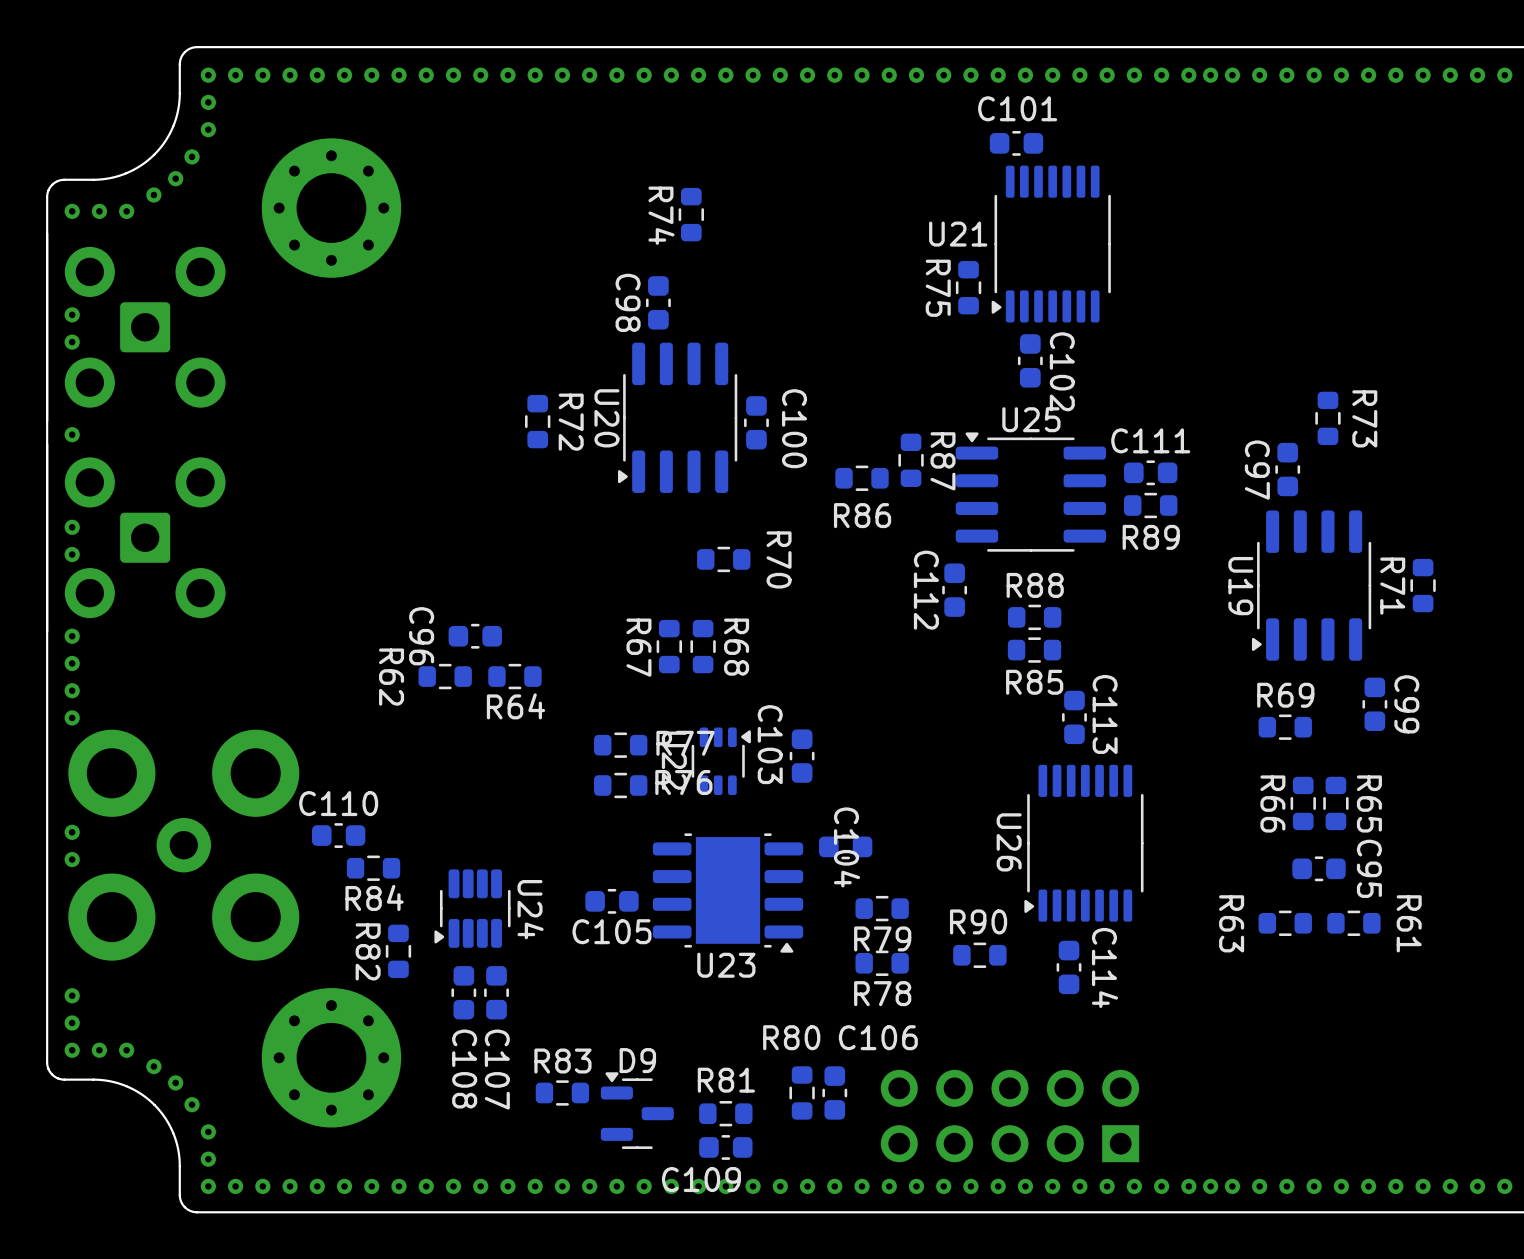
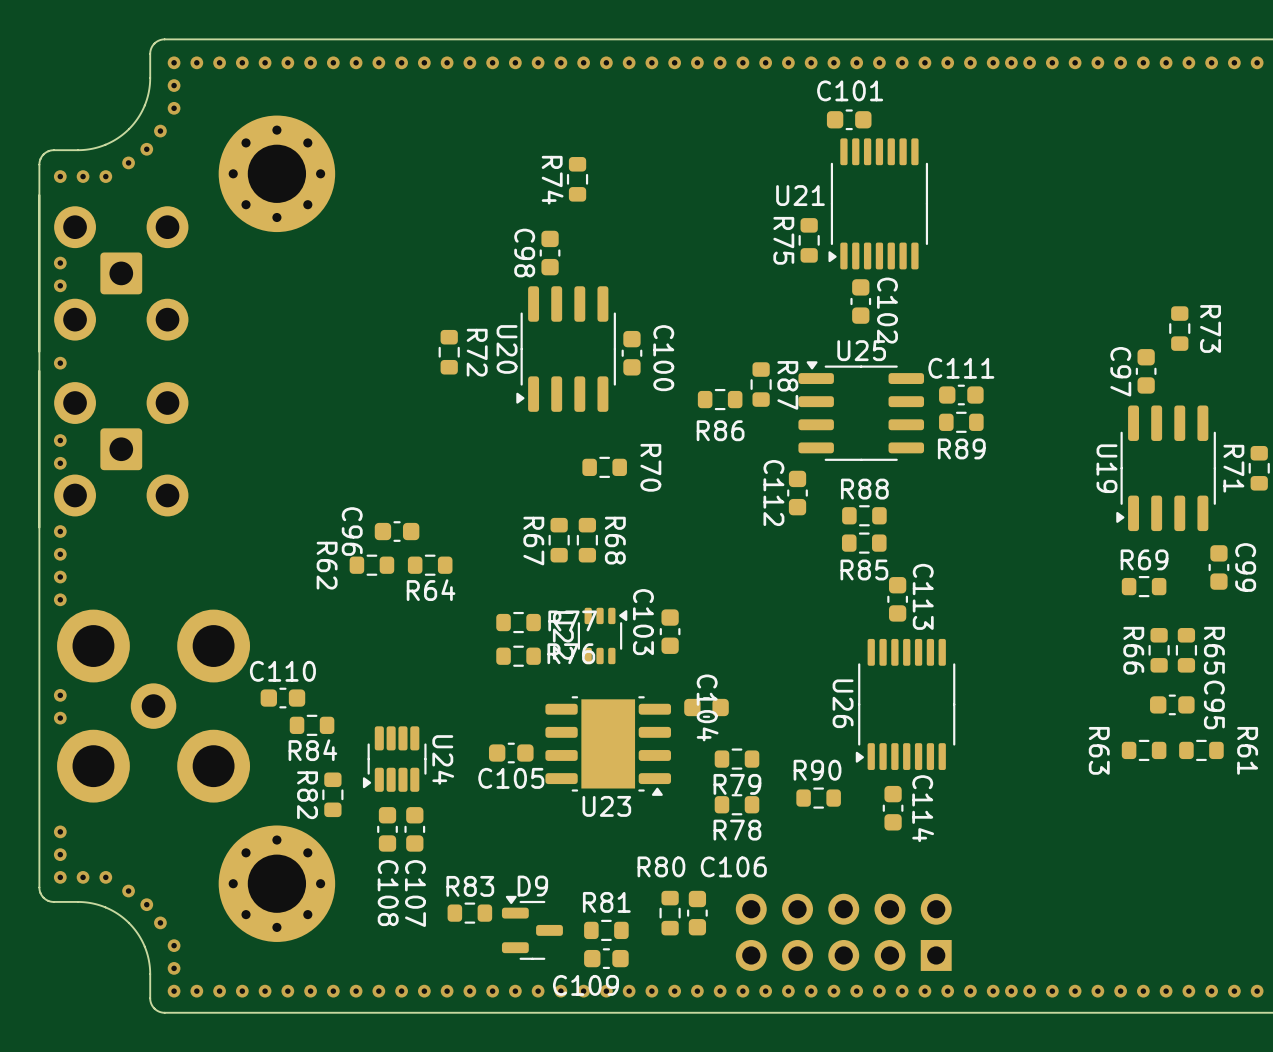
R73 position: (1327, 418) -> (1179, 328)
C97 position: (1287, 469) -> (1146, 371)
U19 position: (1311, 585) -> (1166, 468)
R71 position: (1423, 585) -> (1259, 468)
C99 position: (1374, 704) -> (1218, 567)
R69 position: (1285, 727) -> (1144, 586)
R66 position: (1303, 803) -> (1159, 650)
R65 position: (1335, 803) -> (1186, 650)
C95 position: (1319, 868) -> (1172, 704)
R63 position: (1285, 923) -> (1144, 750)
R61 position: (1353, 923) -> (1201, 750)

